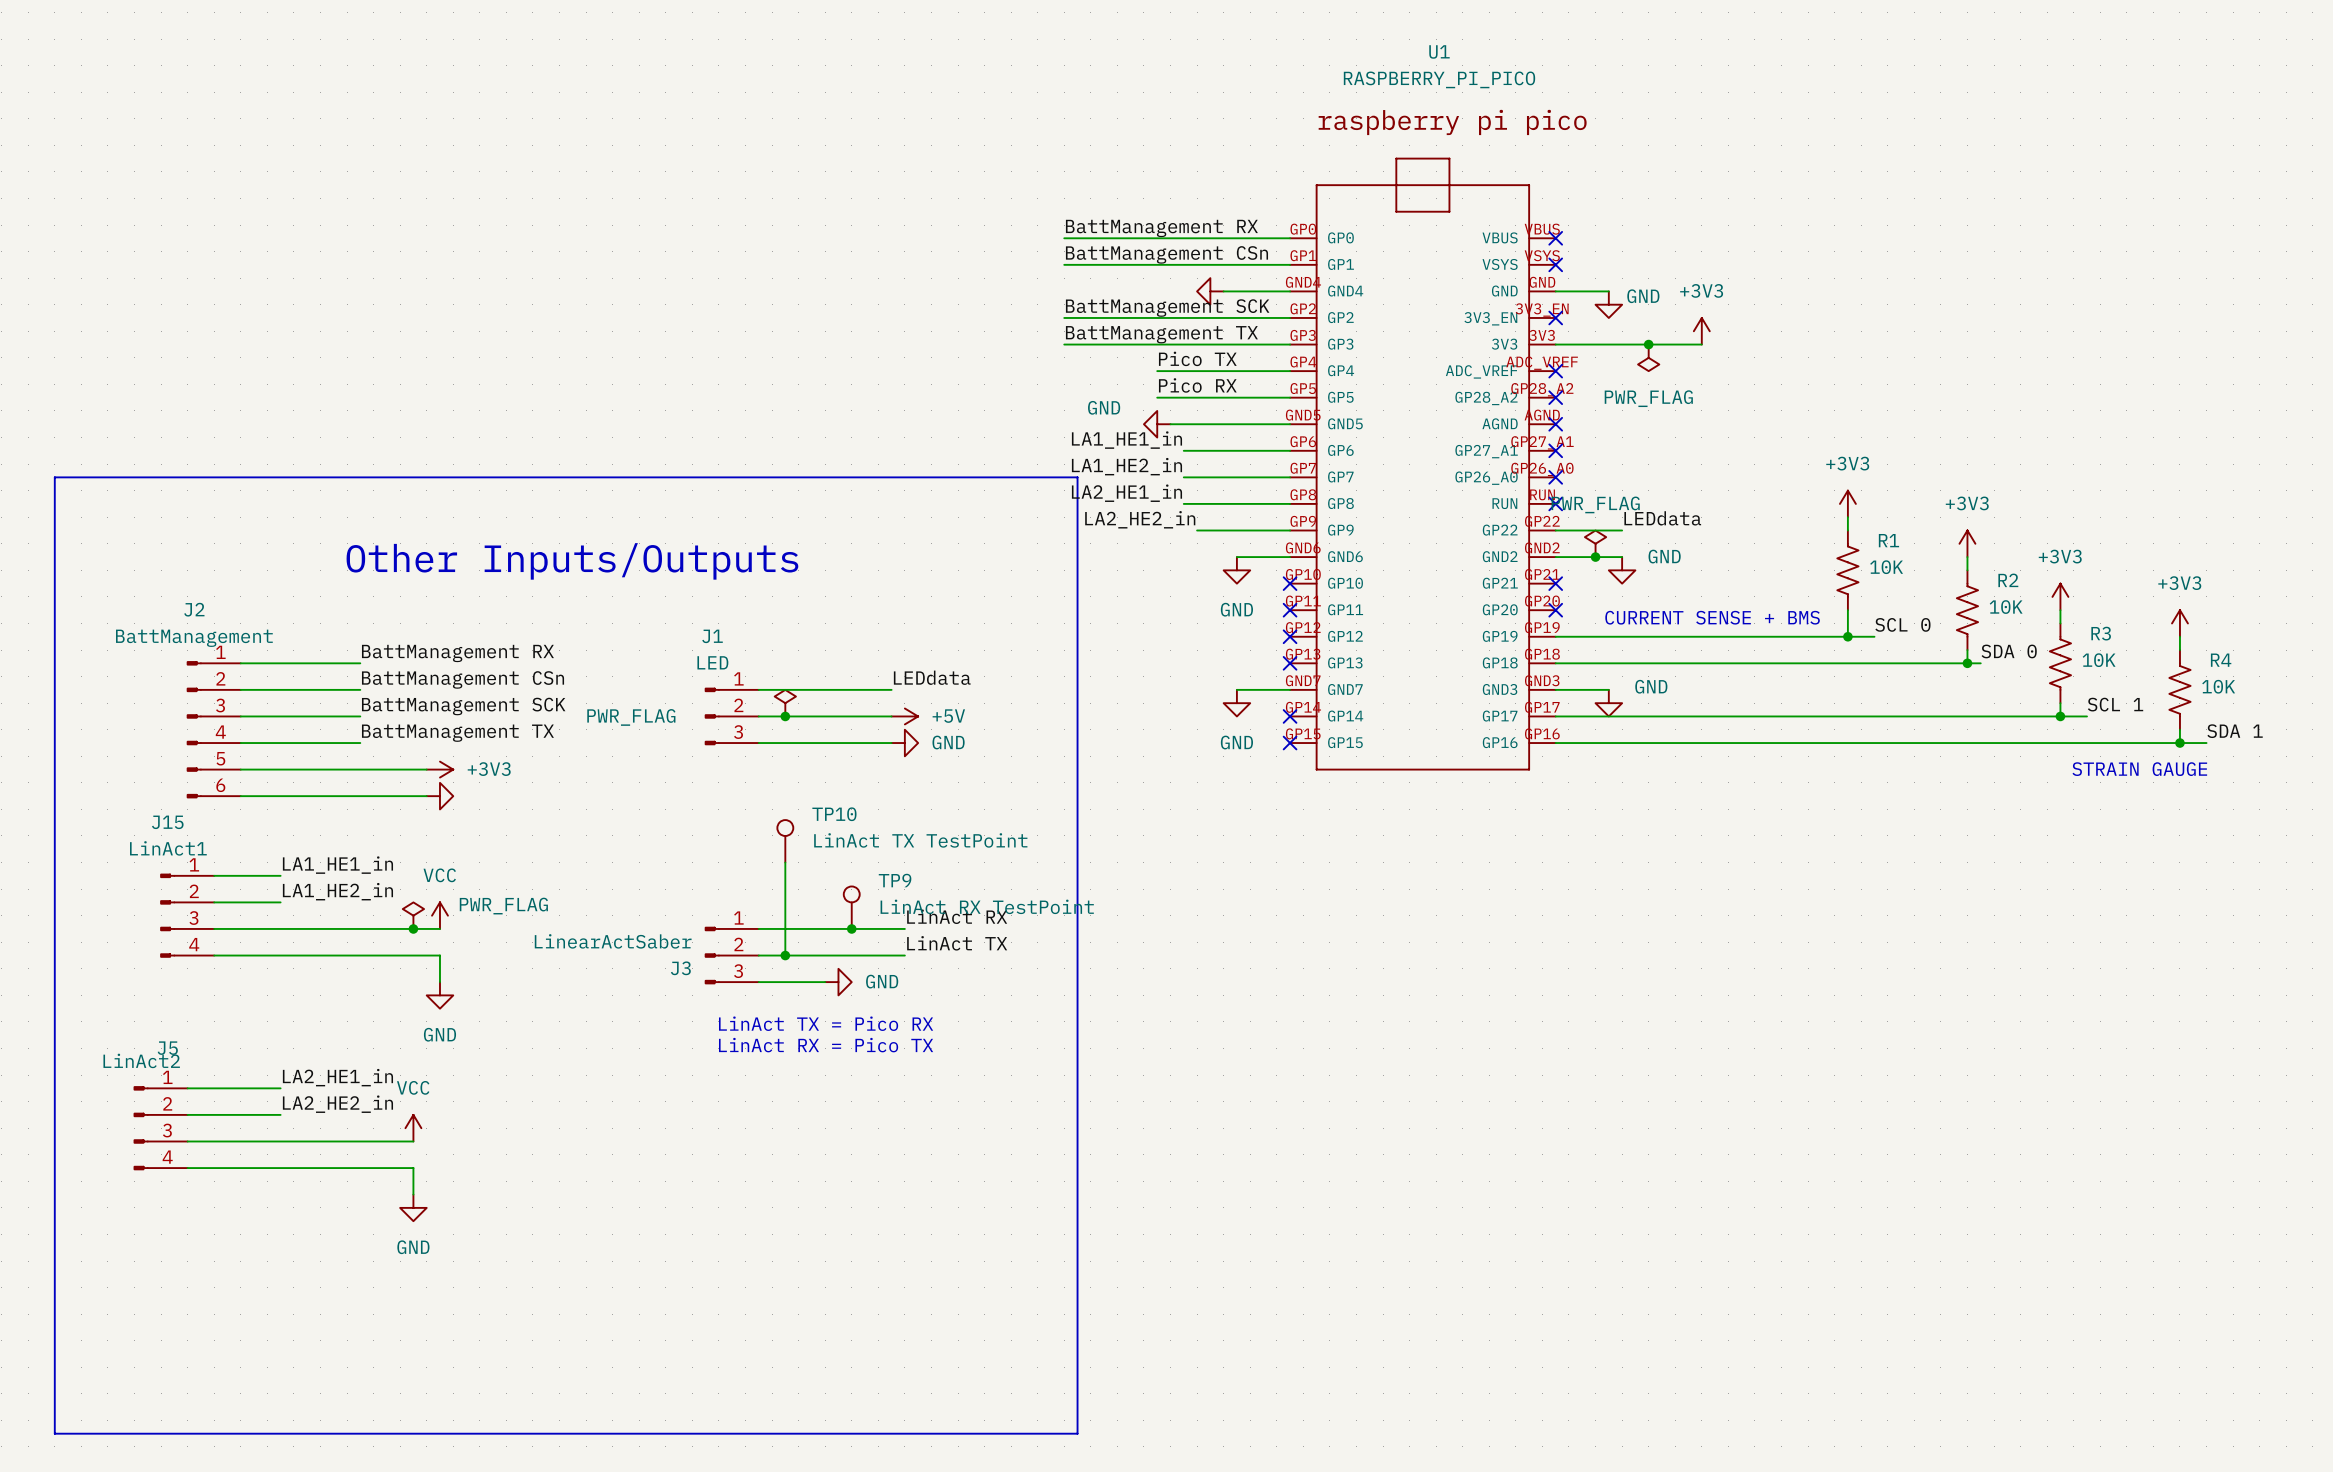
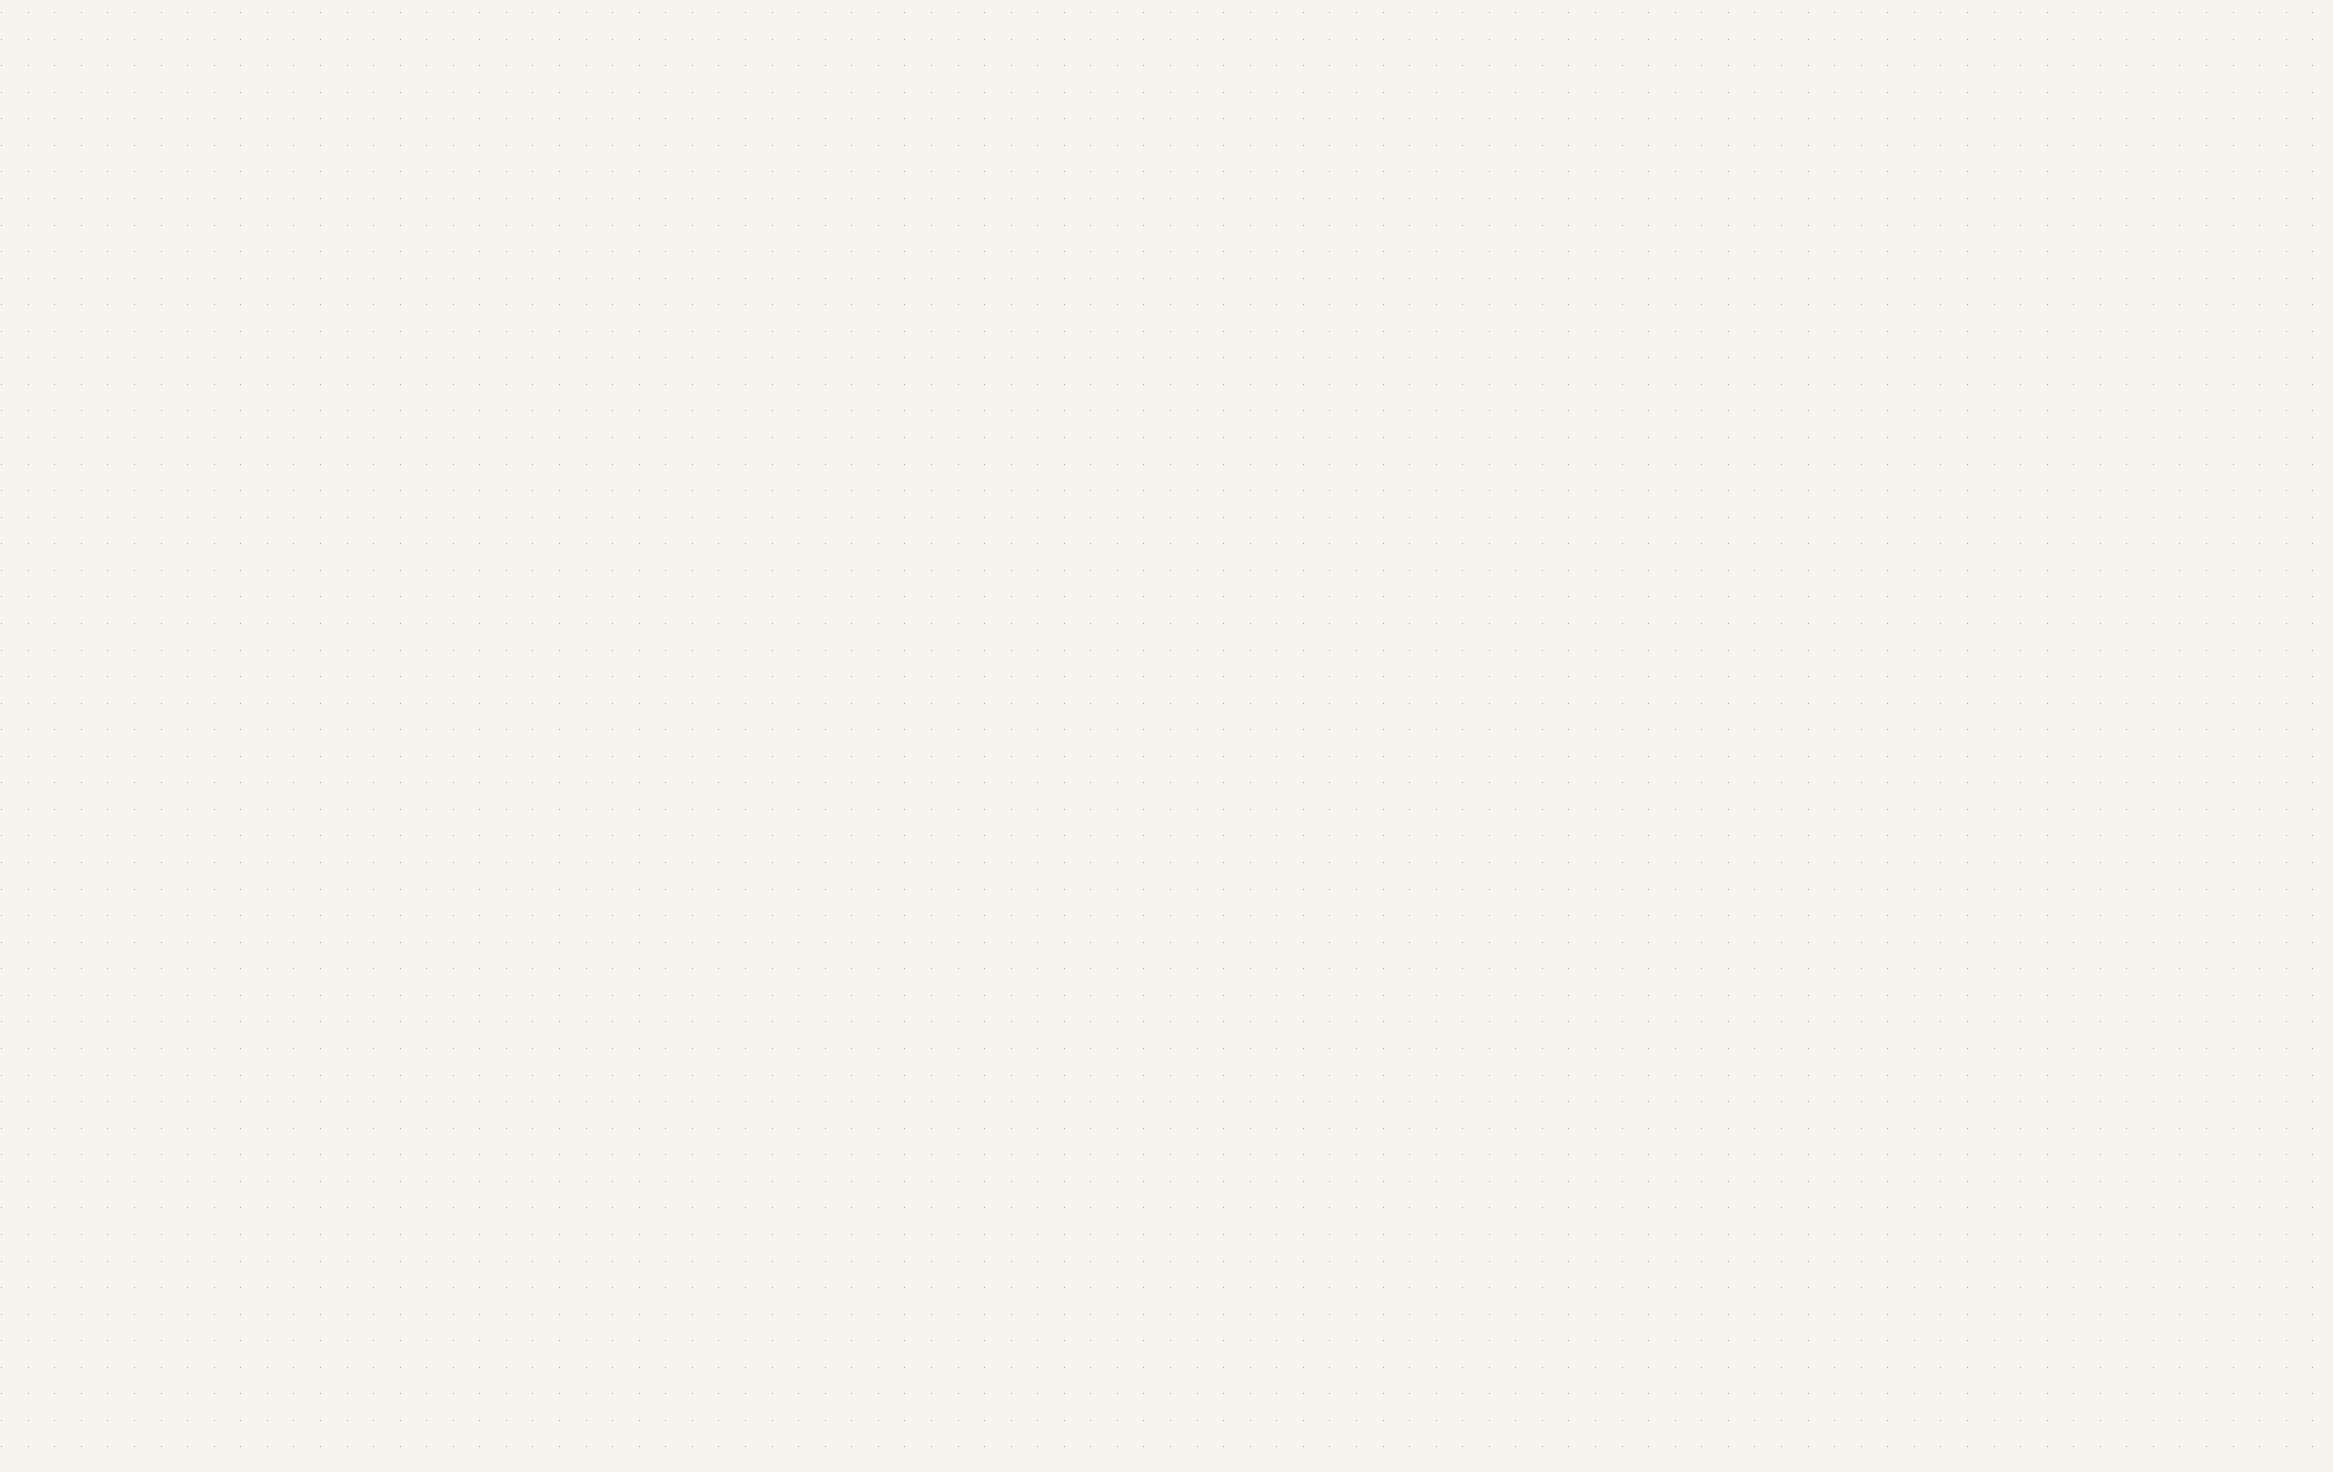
label: BattManagement RX (1161, 228) -> none
wire: (1064, 238) (1290, 238) -> none
no-connect mark: (1555, 238) -> none
label: BattManagement CSn (1166, 254) -> none
wire: (1064, 264) (1290, 264) -> none
no-connect mark: (1555, 264) -> none
power symbol: (1210, 291) -> none
wire: (1223, 291) (1290, 291) -> none
wire: (1555, 291) (1608, 291) -> none
power symbol: GND (1608, 304) -> none
label: BattManagement SCK (1167, 308) -> none
wire: (1064, 317) (1290, 317) -> none
no-connect mark: (1555, 317) -> none
power symbol: +3V3 (1701, 331) -> none
label: BattManagement TX (1161, 334) -> none
wire: (1064, 344) (1290, 344) -> none
wire: (1555, 344) (1701, 344) -> none
junction: (1648, 344) -> none
power symbol: PWR_FLAG (1648, 357) -> none
label: Pico TX (1197, 358) -> none
wire: (1157, 371) (1290, 371) -> none
no-connect mark: (1555, 371) -> none
label: Pico RX (1197, 385) -> none
wire: (1157, 397) (1290, 397) -> none
no-connect mark: (1555, 397) -> none
power symbol: GND (1157, 424) -> none
wire: (1170, 424) (1290, 424) -> none
no-connect mark: (1555, 424) -> none
label: LA1_HE1_in (1126, 440) -> none
wire: (1183, 450) (1290, 450) -> none
no-connect mark: (1555, 450) -> none
U1: RASPBERRY_PI_PICO (1422, 464) -> none
label: LA1_HE2_in (1126, 466) -> none
line: (54, 477) (1077, 477) (1077, 1433) (54, 1433) (54, 477) -> none
wire: (1183, 477) (1290, 477) -> none
no-connect mark: (1555, 477) -> none
label: LA2_HE1_in (1126, 493) -> none
wire: (1183, 503) (1290, 503) -> none
no-connect mark: (1555, 503) -> none
power symbol: +3V3 (1847, 503) -> none
wire: (1847, 517) (1847, 530) -> none
label: LEDdata (1662, 518) -> none
label: LA2_HE2_in (1140, 519) -> none
wire: (1197, 530) (1290, 530) -> none
wire: (1555, 530) (1622, 530) -> none
power symbol: PWR_FLAG (1595, 543) -> none
power symbol: +3V3 (1967, 543) -> none
wire: (1236, 557) (1290, 557) -> none
wire: (1555, 557) (1622, 557) -> none
junction: (1595, 557) -> none
wire: (1967, 557) (1967, 570) -> none
text: Other Inputs/Outputs (572, 561) -> none
power symbol: GND (1236, 570) -> none
power symbol: GND (1622, 570) -> none
R1: 10K (1847, 570) -> none
no-connect mark: (1290, 583) -> none
no-connect mark: (1555, 583) -> none
power symbol: +3V3 (2060, 596) -> none
no-connect mark: (1290, 610) -> none
no-connect mark: (1555, 610) -> none
wire: (1847, 610) (1847, 636) -> none
R2: 10K (1967, 610) -> none
wire: (2060, 610) (2060, 623) -> none
text: CURRENT SENSE + BMS (1712, 617) -> none
power symbol: +3V3 (2179, 623) -> none
label: SCL 0 (1902, 624) -> none
no-connect mark: (1290, 636) -> none
wire: (1555, 636) (1874, 636) -> none
junction: (1847, 636) -> none
wire: (2179, 636) (2179, 650) -> none
wire: (1967, 650) (1967, 663) -> none
label: SDA 0 (2009, 651) -> none
label: BattManagement RX (457, 653) -> none
wire: (240, 663) (360, 663) -> none
no-connect mark: (1290, 663) -> none
wire: (1555, 663) (1980, 663) -> none
junction: (1967, 663) -> none
R3: 10K (2060, 663) -> none
label: LEDdata (932, 677) -> none
label: BattManagement CSn (463, 679) -> none
wire: (240, 689) (360, 689) -> none
wire: (758, 689) (891, 689) -> none
wire: (1236, 689) (1290, 689) -> none
wire: (1555, 689) (1608, 689) -> none
R4: 10K (2179, 689) -> none
power symbol: PWR_FLAG (785, 703) -> none
power symbol: GND (1236, 703) -> none
power symbol: GND (1608, 703) -> none
wire: (2060, 703) (2060, 716) -> none
label: SCL 1 (2115, 704) -> none
label: BattManagement SCK (463, 706) -> none
wire: (240, 716) (360, 716) -> none
J1: LED (731, 716) -> none
wire: (758, 716) (891, 716) -> none
junction: (785, 716) -> none
power symbol: +5V (904, 716) -> none
no-connect mark: (1290, 716) -> none
wire: (1555, 716) (2087, 716) -> none
junction: (2060, 716) -> none
J2: BattManagement (213, 729) -> none
wire: (2179, 729) (2179, 743) -> none
label: SDA 1 (2235, 731) -> none
label: BattManagement TX (457, 733) -> none
wire: (240, 743) (360, 743) -> none
wire: (758, 743) (891, 743) -> none
power symbol: GND (904, 743) -> none
no-connect mark: (1290, 743) -> none
wire: (1555, 743) (2206, 743) -> none
junction: (2179, 743) -> none
wire: (240, 769) (426, 769) -> none
power symbol: +3V3 (439, 769) -> none
text: STRAIN GAUGE (2139, 769) -> none
wire: (240, 796) (426, 796) -> none
power symbol: (439, 796) -> none
TP10: LinAct TX TestPoint (785, 841) -> none
wire: (785, 862) (785, 955) -> none
label: LA1_HE1_in (337, 865) -> none
wire: (214, 875) (280, 875) -> none
label: LA1_HE2_in (337, 891) -> none
wire: (214, 902) (280, 902) -> none
TP9: LinAct RX TestPoint (851, 907) -> none
J15: LinAct1 (187, 915) -> none
power symbol: PWR_FLAG (413, 915) -> none
power symbol: VCC (439, 915) -> none
label: LinAct RX (957, 916) -> none
wire: (214, 928) (439, 928) -> none
junction: (413, 928) -> none
wire: (758, 928) (904, 928) -> none
junction: (851, 928) -> none
label: LinAct TX (957, 943) -> none
wire: (214, 955) (439, 955) (439, 982) -> none
J3: LinearActSaber (731, 955) -> none
wire: (758, 955) (904, 955) -> none
junction: (785, 955) -> none
wire: (758, 982) (825, 982) -> none
power symbol: GND (838, 982) -> none
power symbol: GND (439, 995) -> none
text: LinAct TX = Pico RX (826, 1023) -> none
text: LinAct RX = Pico TX (826, 1045) -> none
label: LA2_HE1_in (337, 1077) -> none
wire: (187, 1088) (280, 1088) -> none
label: LA2_HE2_in (337, 1104) -> none
wire: (187, 1114) (280, 1114) -> none
J5: LinAct2 (160, 1128) -> none
power symbol: VCC (413, 1128) -> none
wire: (187, 1141) (413, 1141) -> none
wire: (187, 1168) (413, 1168) (413, 1194) -> none
power symbol: GND (413, 1207) -> none

